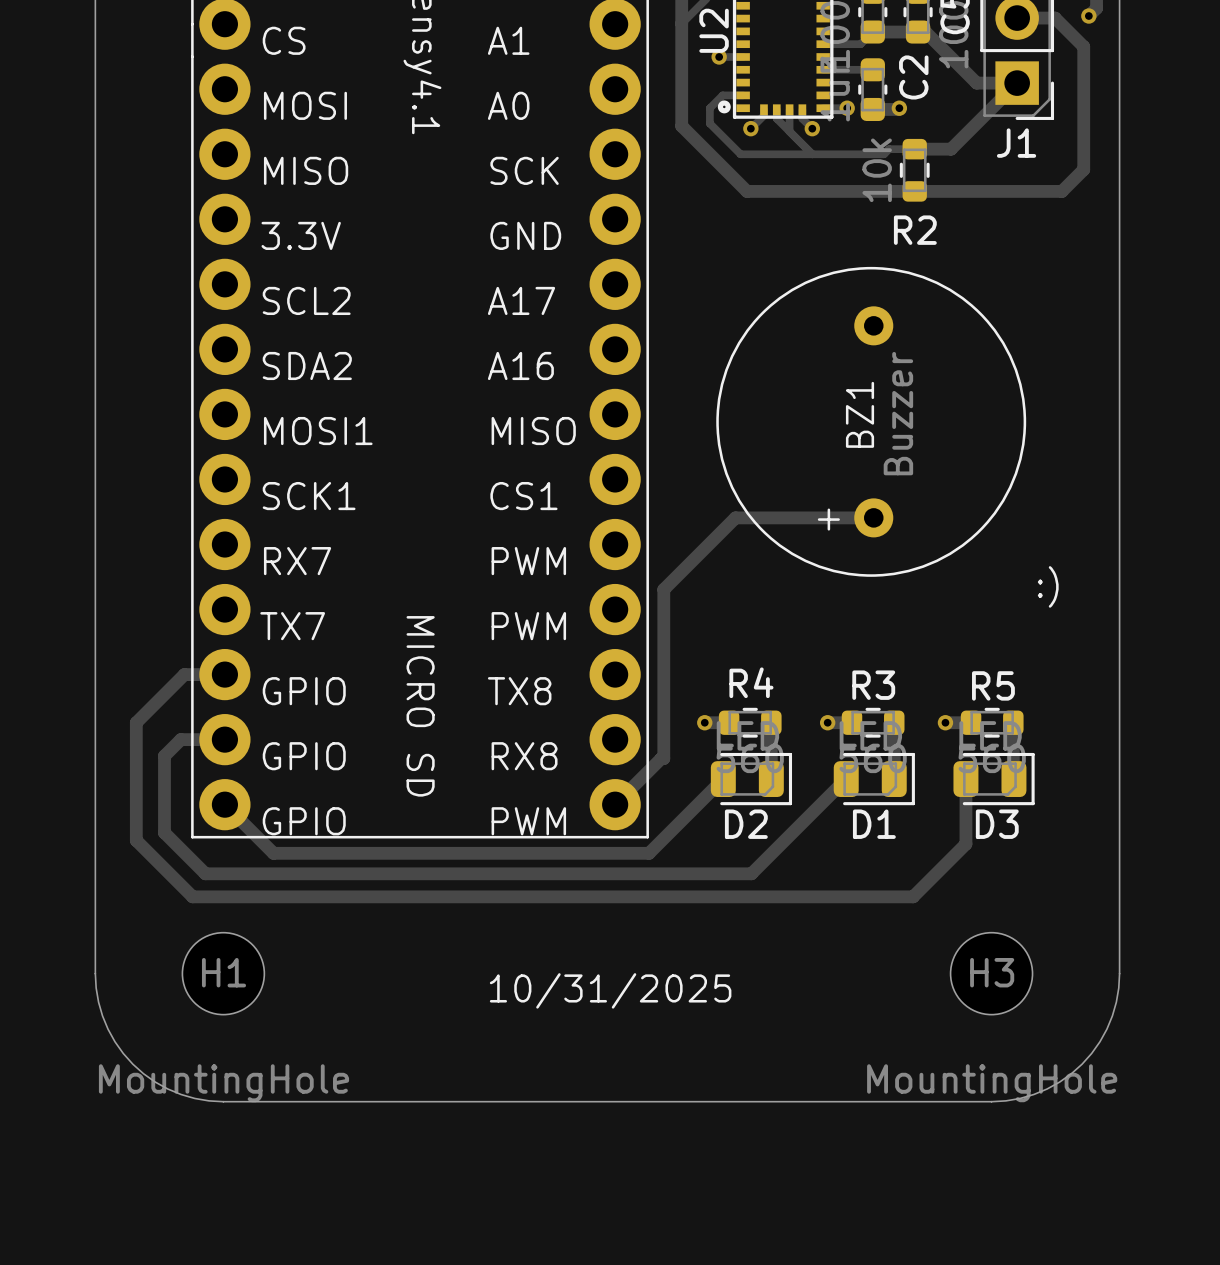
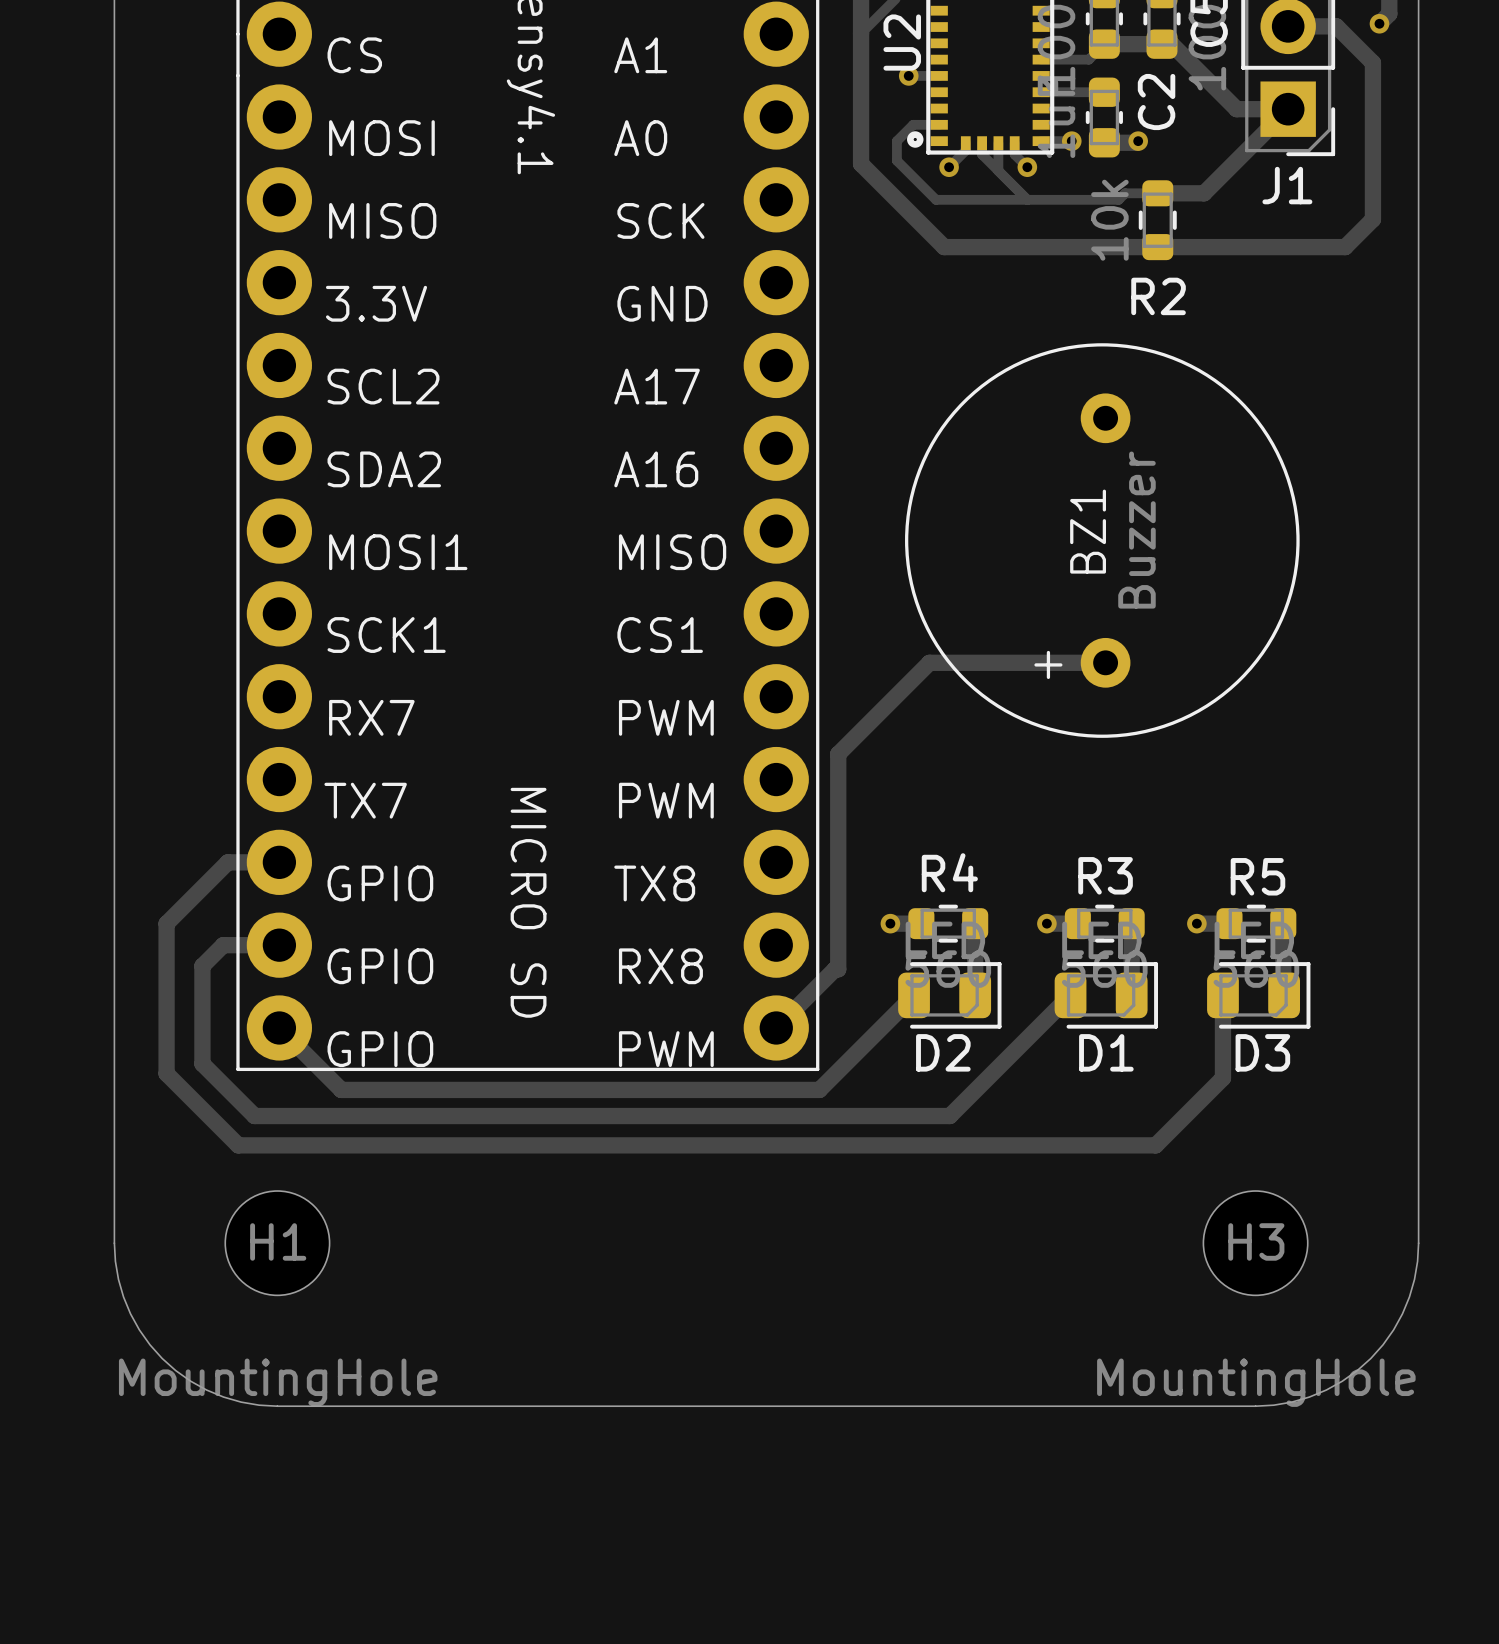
text: :) (1048, 586) -> none
text: 10/31/2025 (610, 990) -> none

